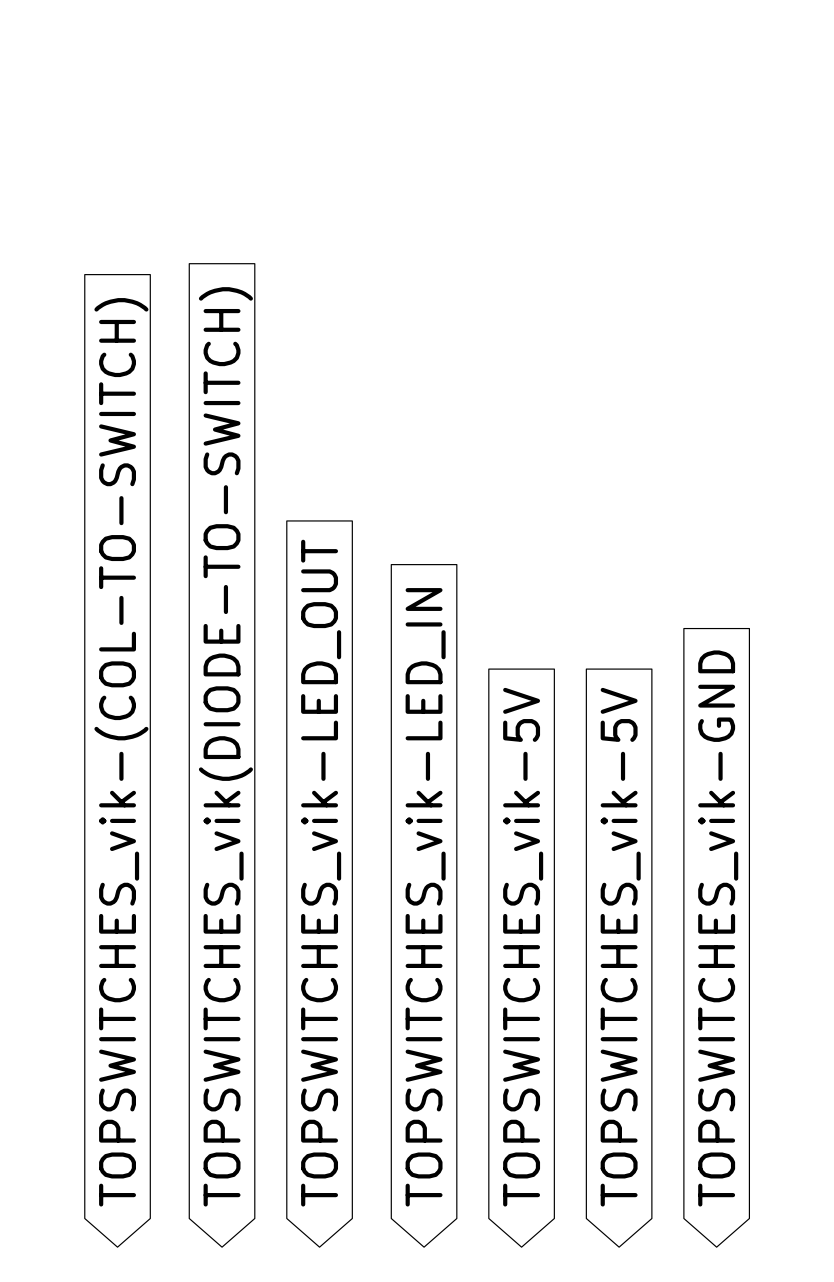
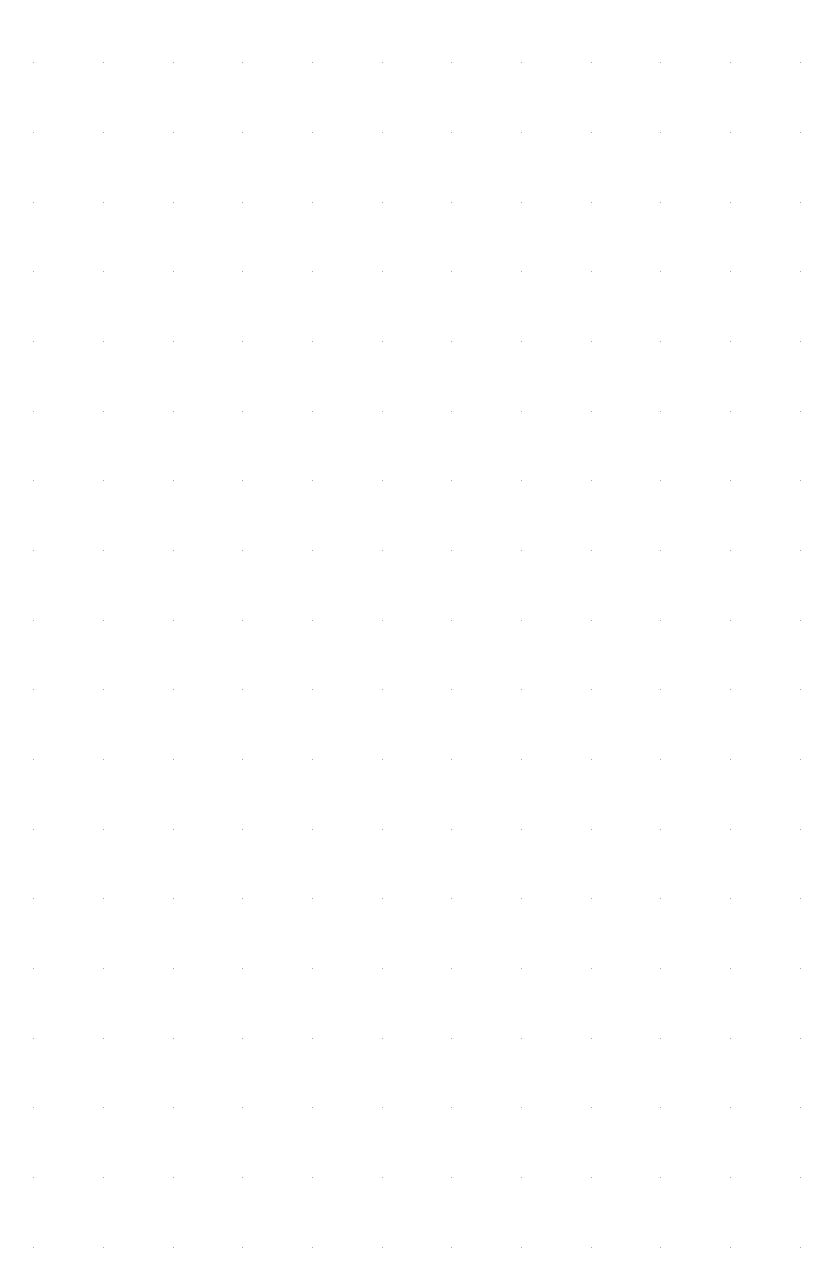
global label: TOPSWITCHES_vik(DIODE-TO-SWITCH) (225, 746) -> none
global label: TOPSWITCHES_vik-(COL-TO-SWITCH) (121, 752) -> none
global label: TOPSWITCHES_vik-LED_OUT (321, 873) -> none
global label: TOPSWITCHES_vik-LED_IN (425, 897) -> none
global label: TOPSWITCHES_vik-GND (718, 928) -> none
global label: TOPSWITCHES_vik-5V (523, 947) -> none
global label: TOPSWITCHES_vik-5V (620, 947) -> none

